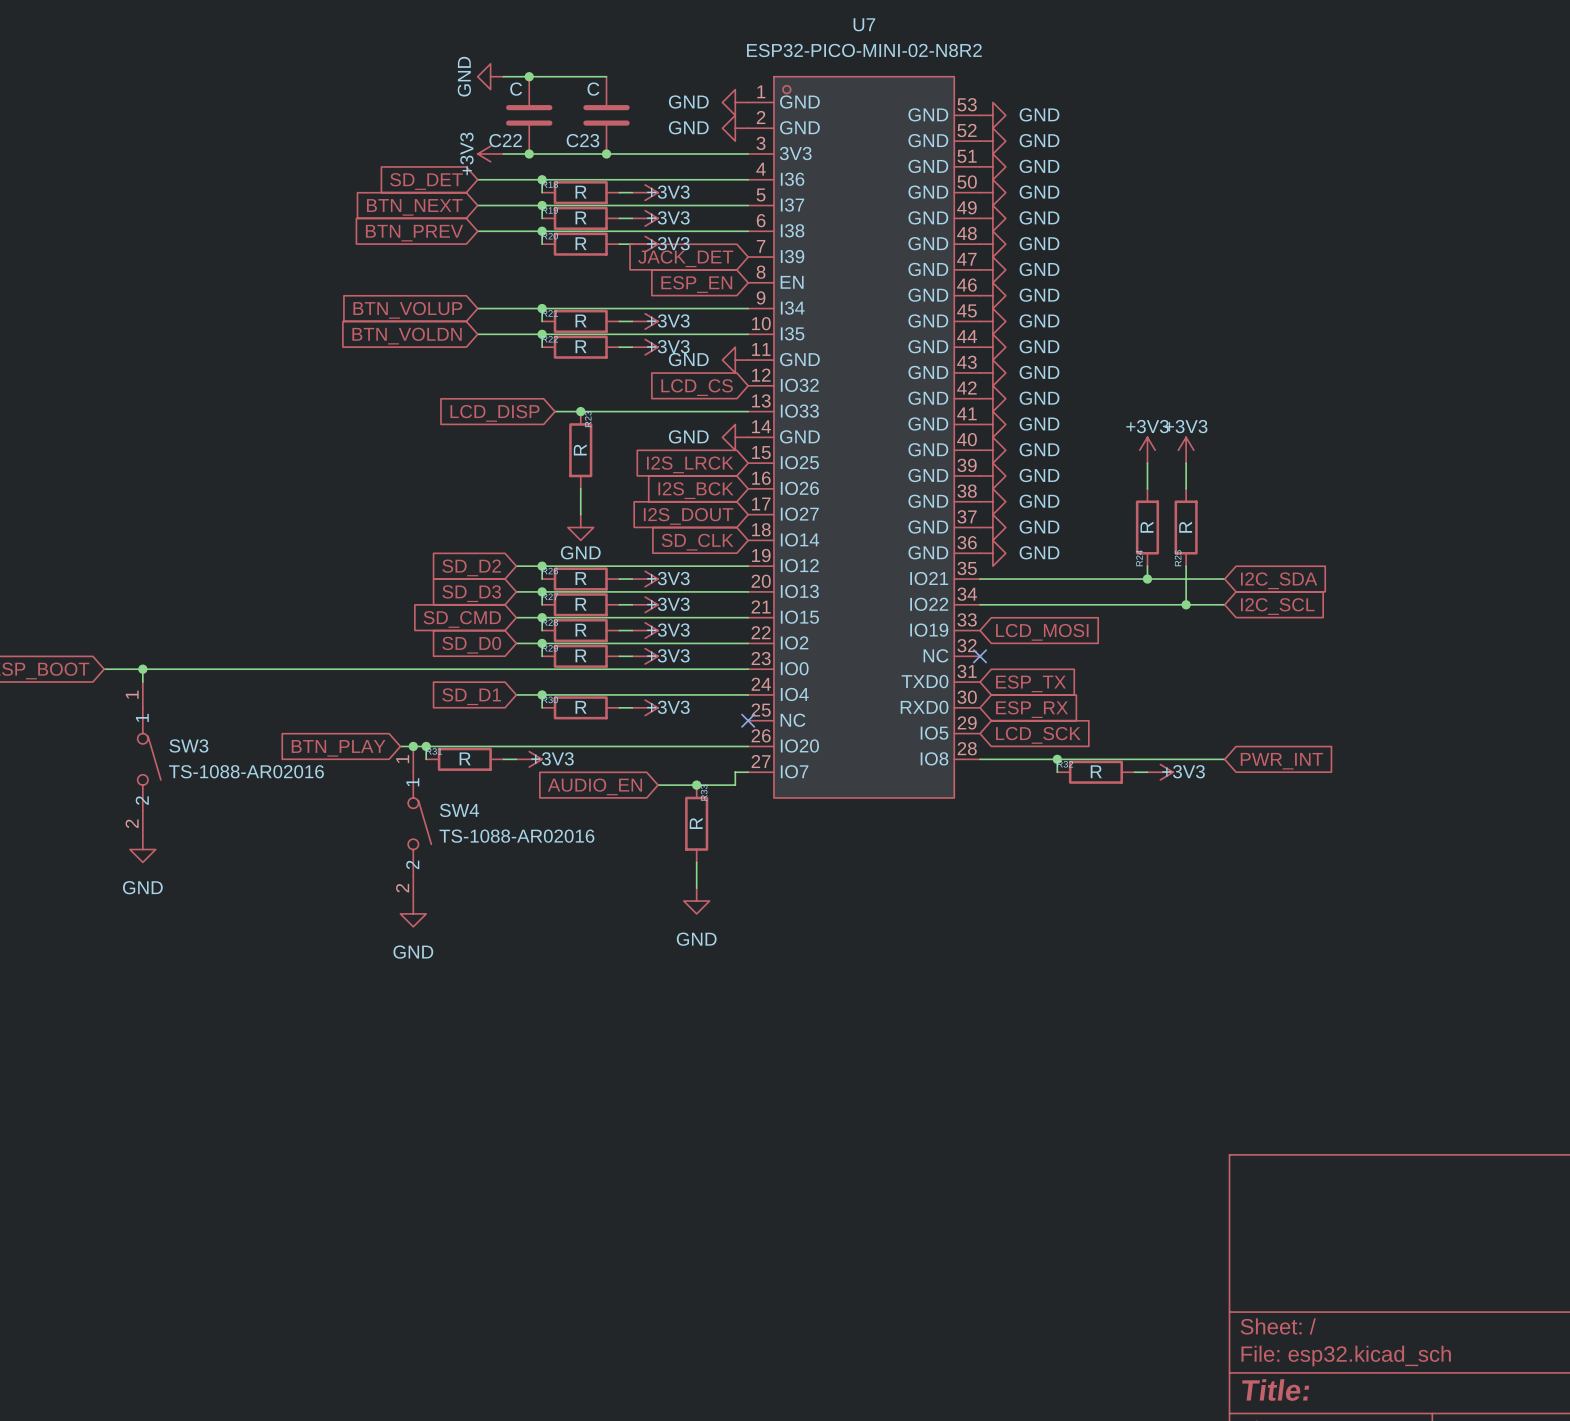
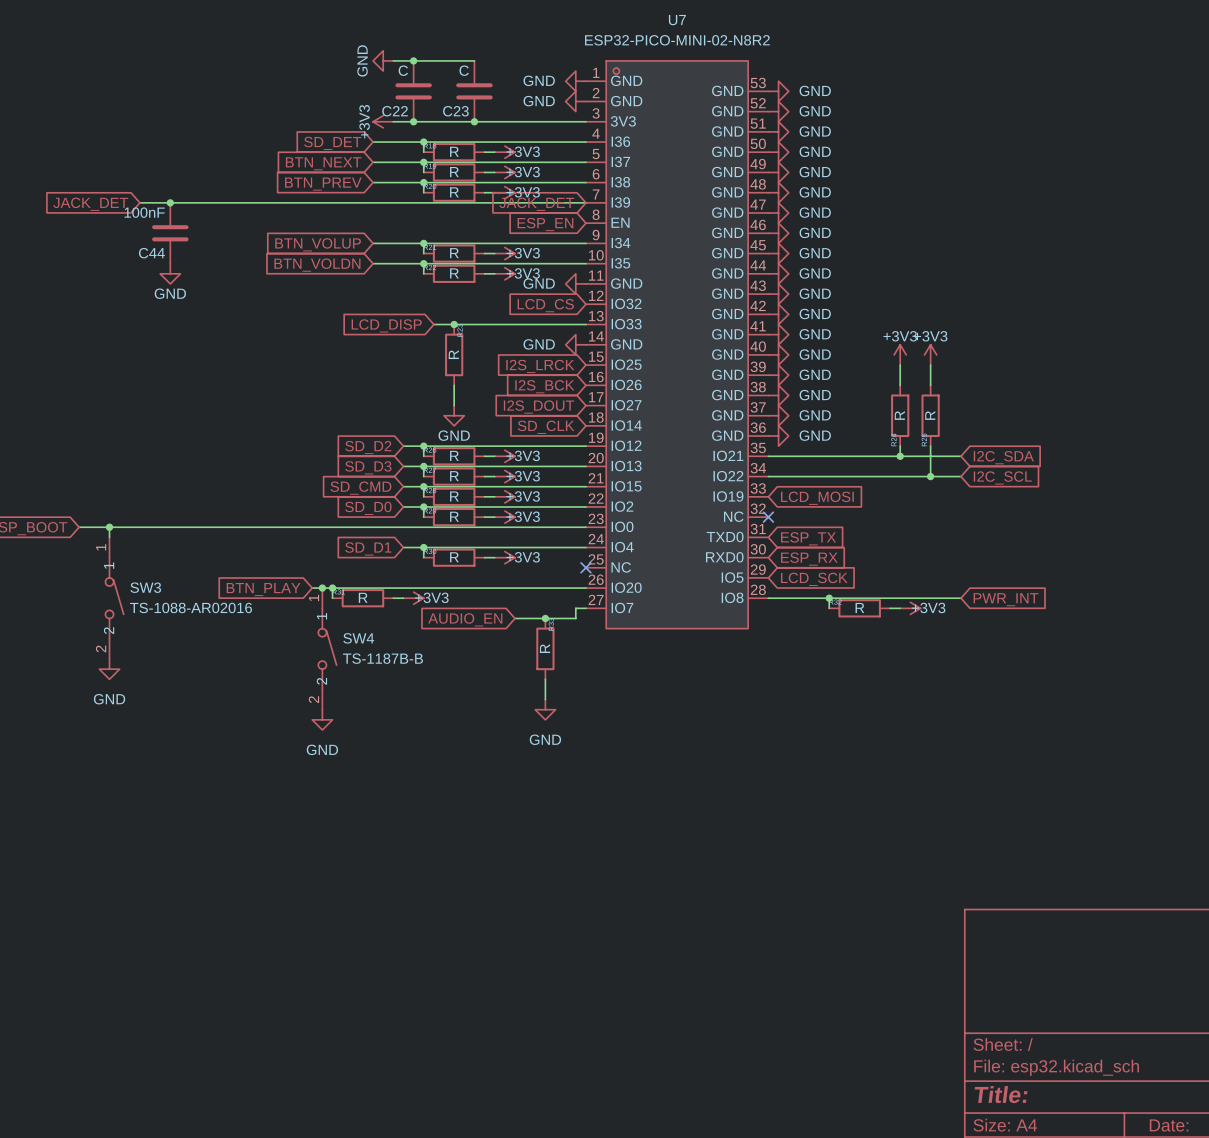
wire: none -> (139, 202) (585, 202)
junction: none -> (170, 202)
global label: none -> JACK_DET (90, 204)
C44: none -> 100nF (170, 233)
power symbol: none -> GND (170, 273)
SW4 value: TS-1088-AR02016 (516, 836) -> TS-1187B-B (382, 658)

